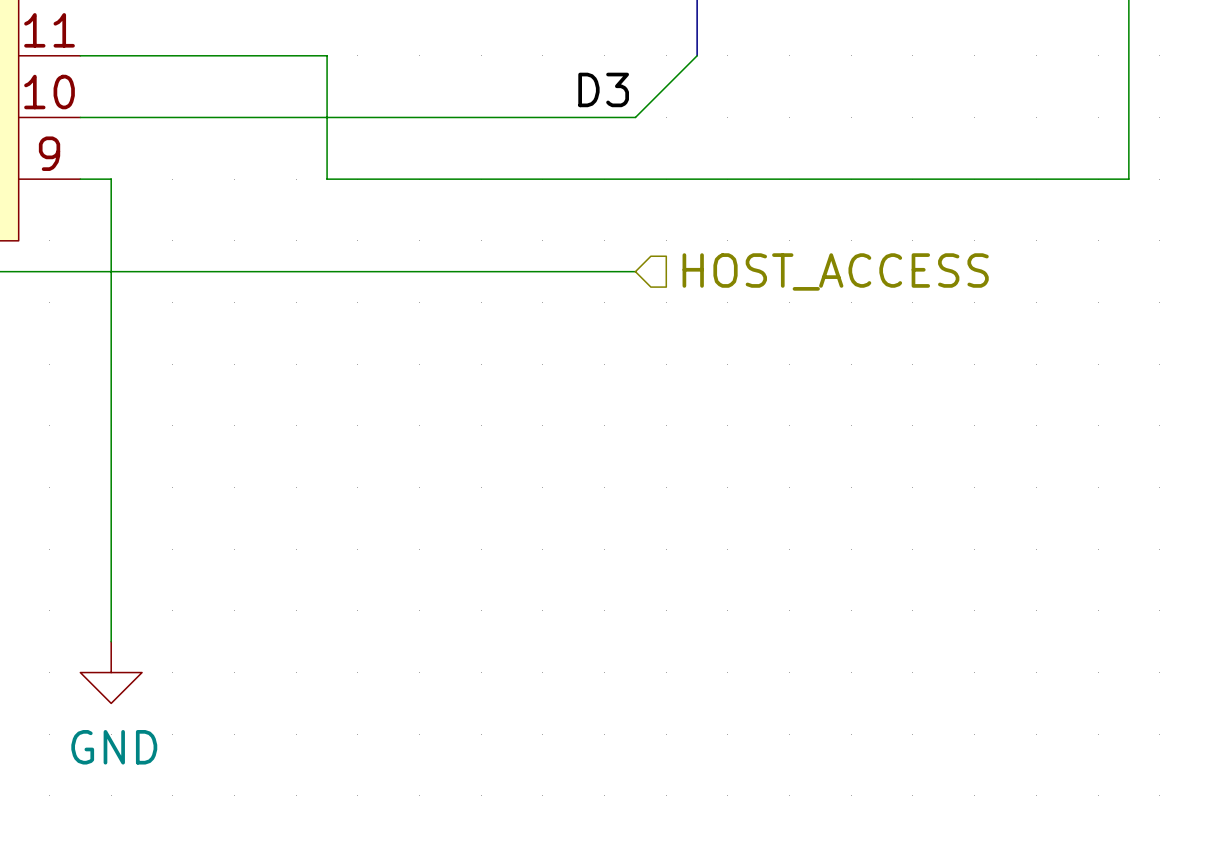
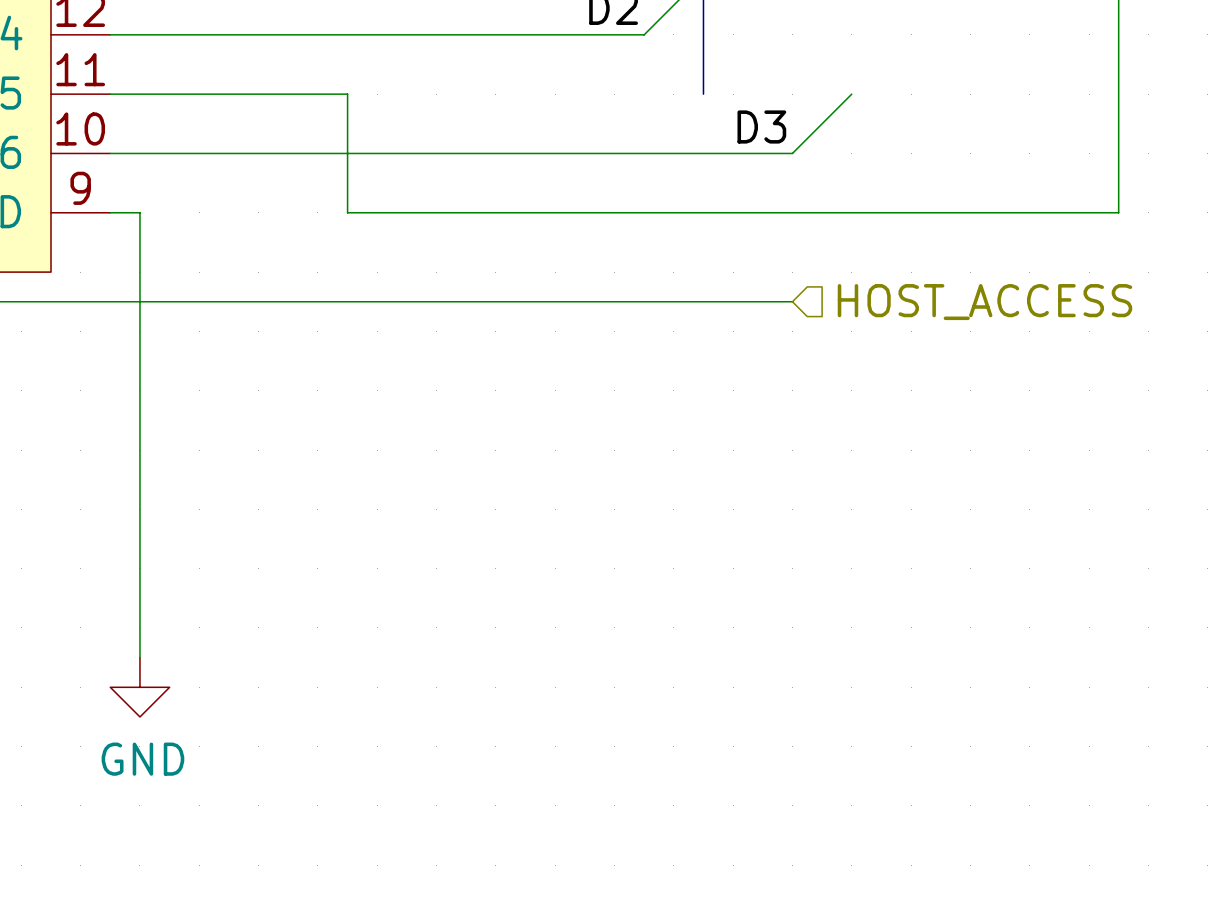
wire: (697, 55) (635, 117) -> (851, 94) (792, 153) (644, 153)
label position: D3 (603, 89) -> D3 (761, 127)
wire: none -> (644, 301) (792, 301)
hierarchical label position: HOST_ACCESS (835, 271) -> HOST_ACCESS (984, 302)

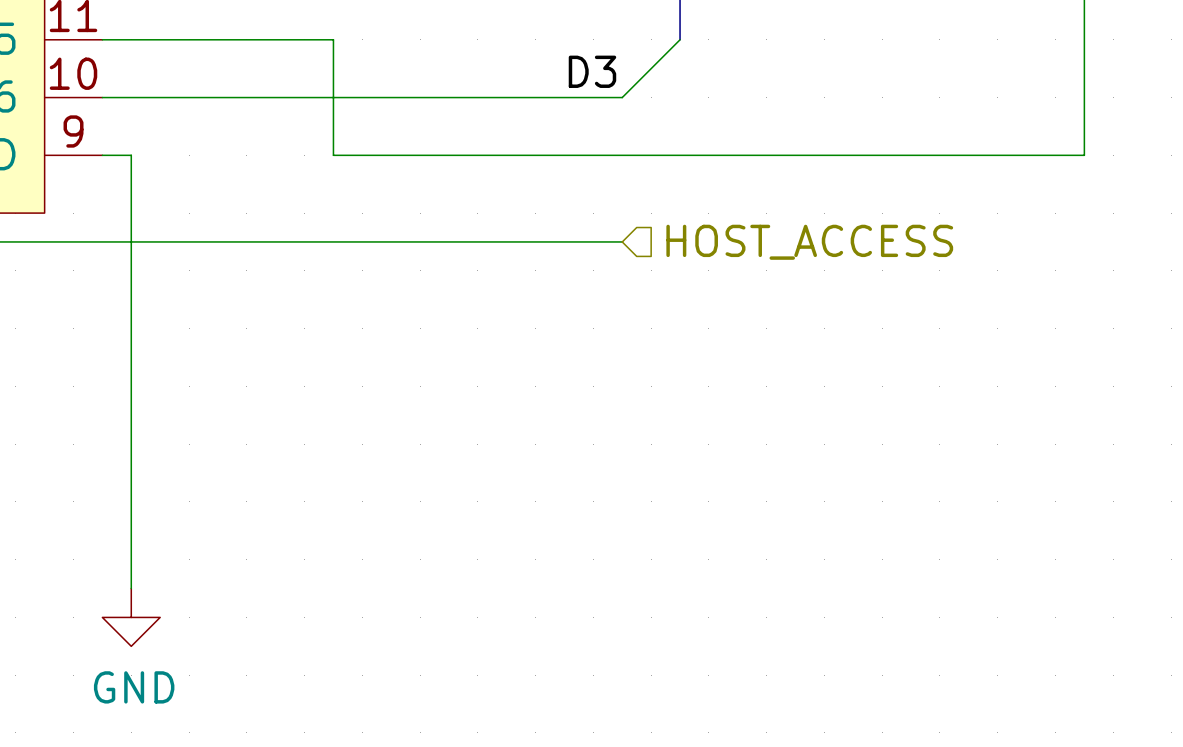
wire: (851, 94) (792, 153) (644, 153) -> (680, 39) (622, 97)
label position: D3 (761, 127) -> D3 (592, 71)
wire: (644, 301) (792, 301) -> none
hierarchical label position: HOST_ACCESS (984, 302) -> HOST_ACCESS (809, 242)

